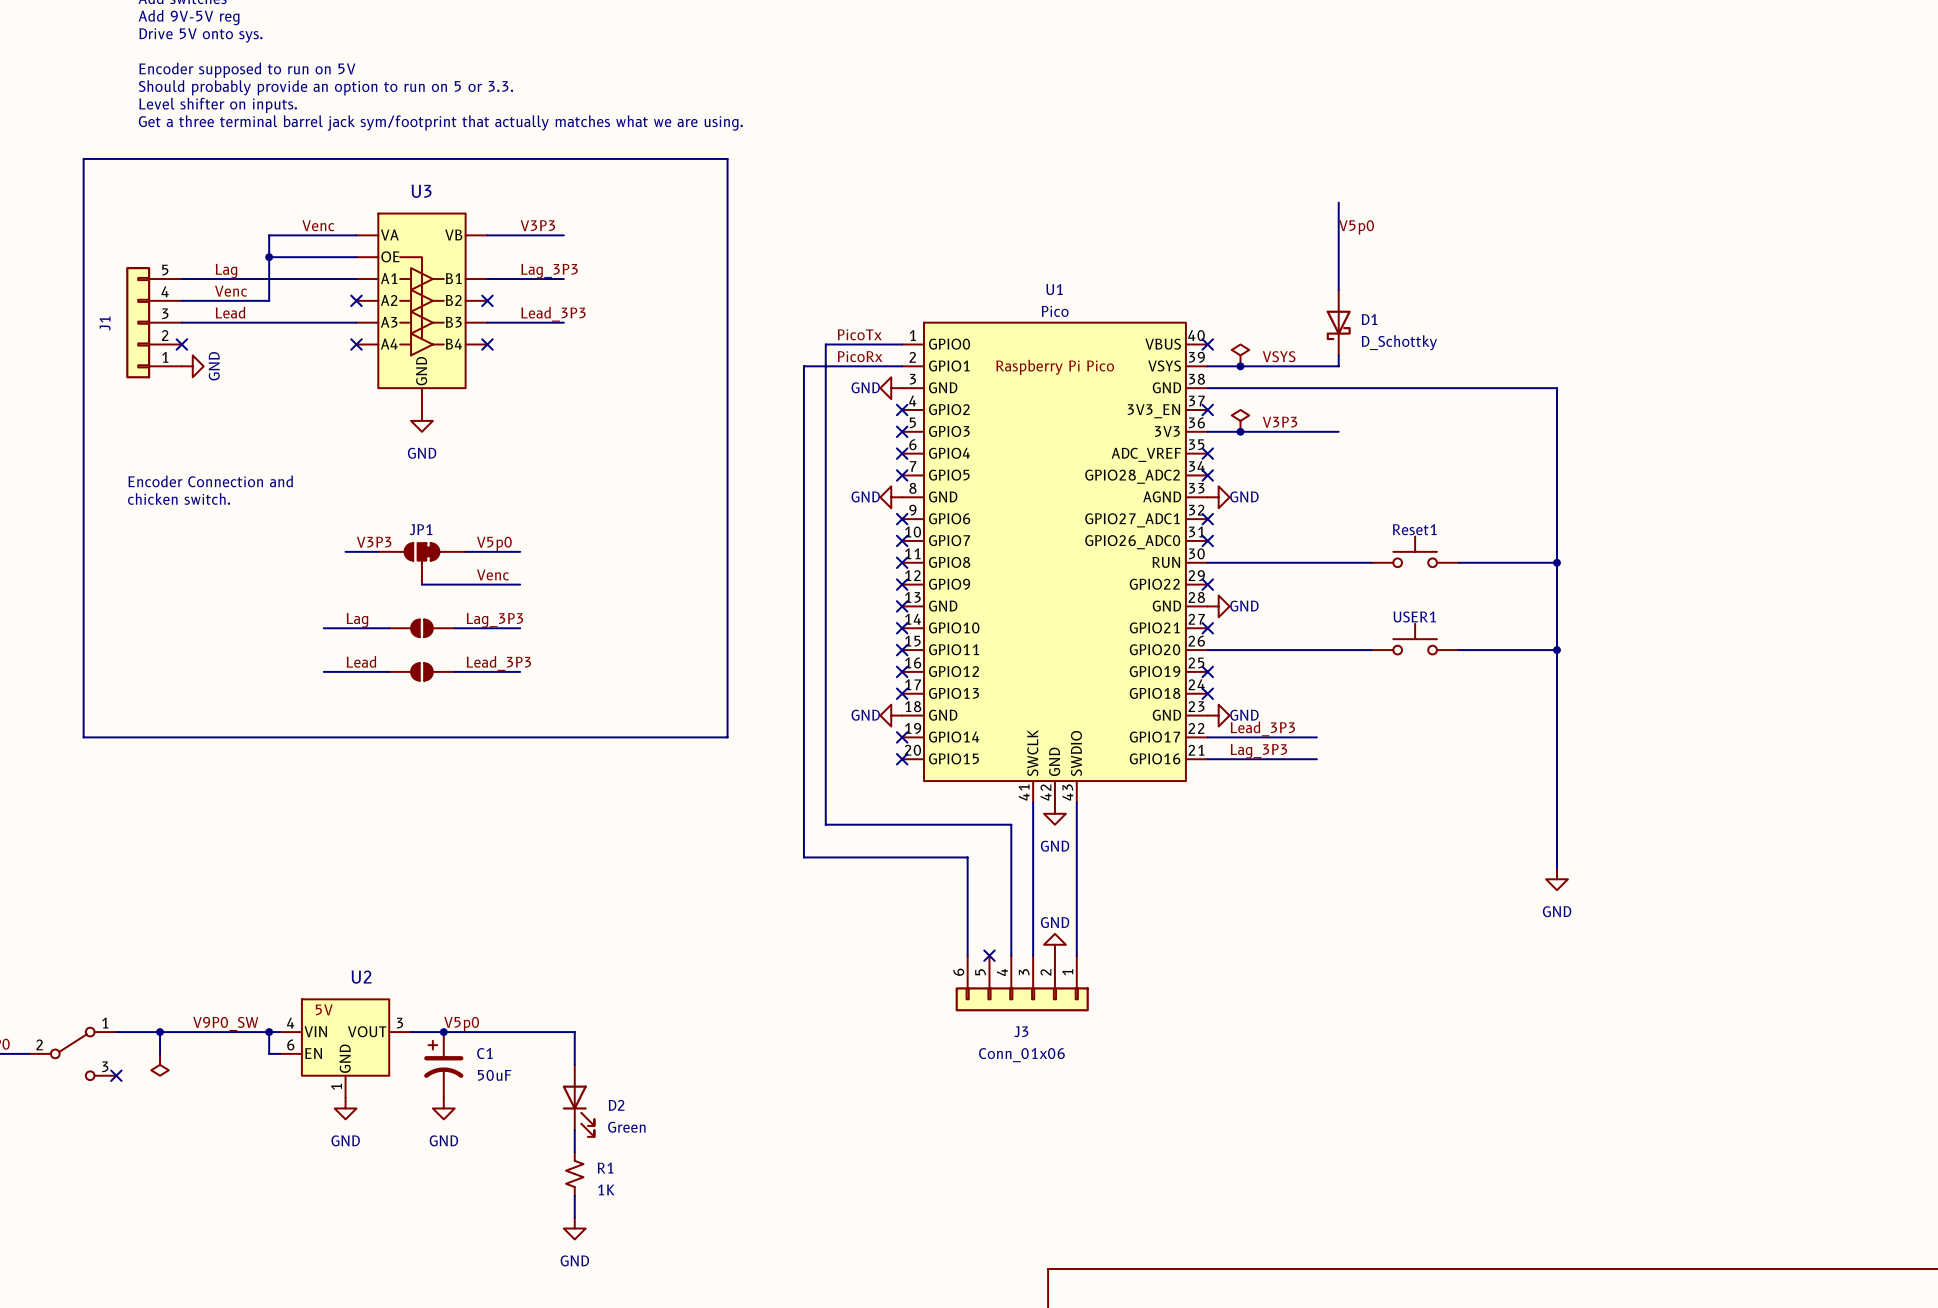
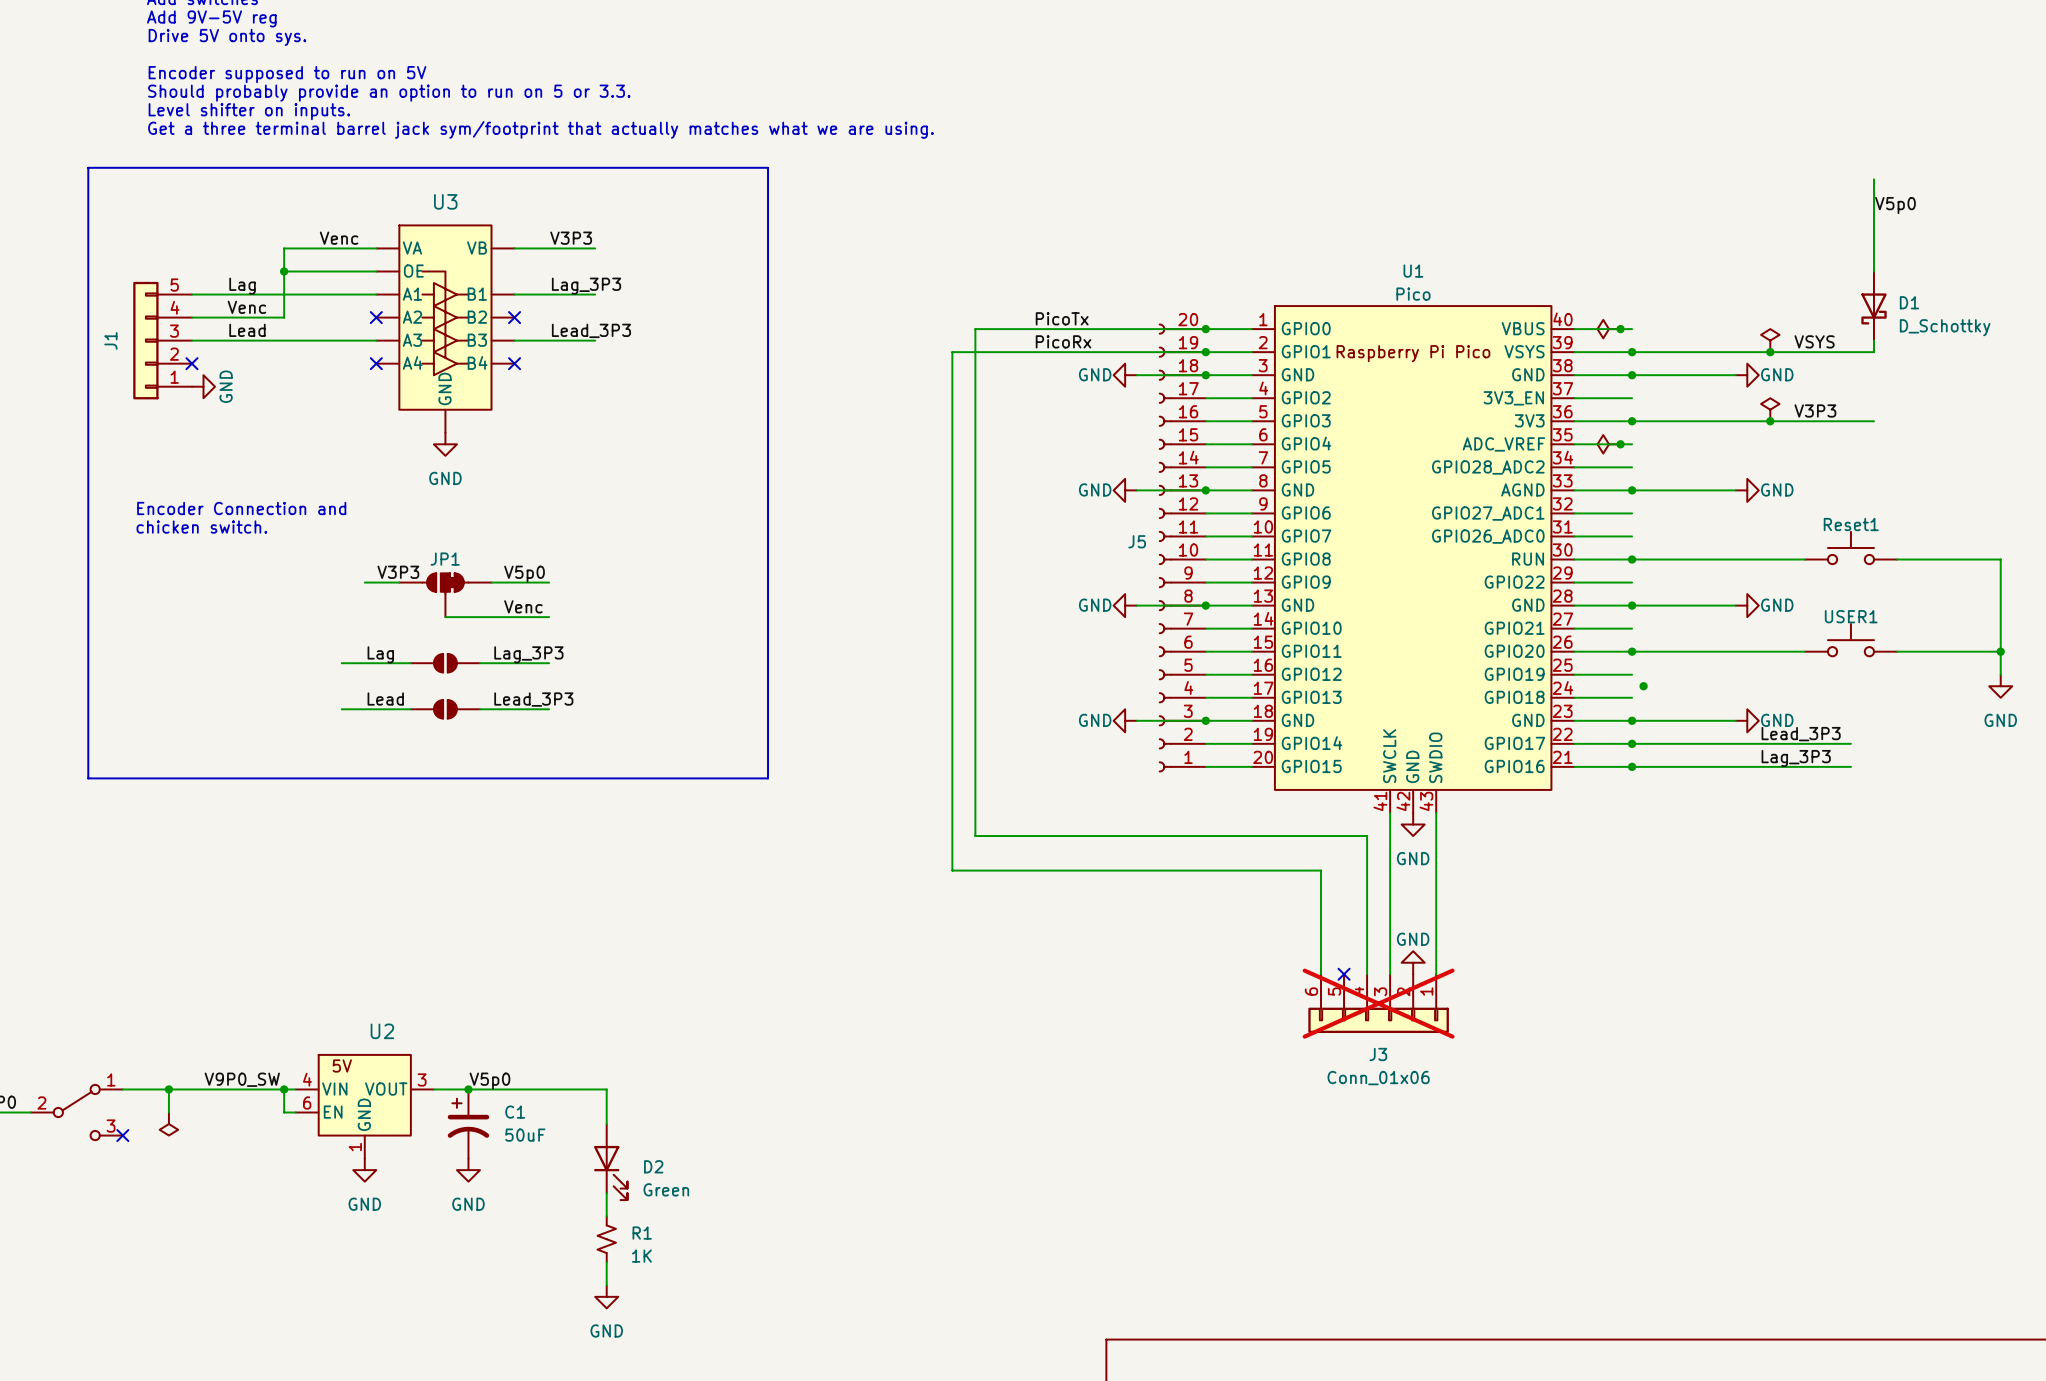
wire: none -> (1874, 179) (1874, 271)
label: none -> V5p0 (1895, 205)
wire: (1338, 202) (1338, 289) -> none
label: V5p0 (1356, 227) -> none
junction: none -> (1205, 329)
wire: none -> (1251, 329) (975, 329) (975, 836) (1367, 836) (1367, 974)
wire: none -> (1574, 329) (1632, 329)
power symbol: none -> (1609, 329)
junction: none -> (1620, 329)
D1 position: (1338, 322) -> (1874, 306)
power symbol: none -> (1770, 340)
wire: none -> (1874, 340) (1874, 352) (1574, 352)
label: none -> VSYS (1814, 341)
junction: none -> (1205, 352)
junction: none -> (1632, 352)
junction: none -> (1770, 352)
label position: PicoTx (859, 334) -> PicoTx (1062, 318)
wire: (902, 344) (825, 344) (825, 824) (902, 824) -> (1251, 352) (952, 352) (952, 870)
no-connect mark: (1207, 344) -> none
power symbol: none -> GND (1125, 375)
junction: none -> (1205, 375)
power symbol: (1240, 355) -> none
wire: none -> (1574, 375) (1735, 375)
junction: none -> (1632, 375)
power symbol: none -> GND (1747, 375)
label position: PicoRx (860, 356) -> PicoRx (1063, 341)
label: VSYS (1279, 356) -> none
wire: (902, 366) (803, 366) (803, 857) (967, 857) (967, 955) -> none
junction: (1240, 366) -> none
wire: none -> (1574, 398) (1632, 398)
power symbol: GND (891, 388) -> none
wire: (1207, 388) (1556, 388) (1556, 868) -> none
power symbol: none -> (1770, 409)
label: none -> V3P3 (1815, 410)
wire: none -> (1574, 421) (1874, 421)
junction: none -> (1632, 421)
junction: none -> (1770, 421)
no-connect mark: (902, 409) -> none
no-connect mark: (1207, 409) -> none
power symbol: (1240, 420) -> none
wire: none -> (1574, 444) (1632, 444)
power symbol: none -> (1609, 444)
junction: none -> (1620, 444)
label: V3P3 (1280, 422) -> none
no-connect mark: (902, 431) -> none
junction: (1240, 431) -> none
wire: none -> (1574, 467) (1632, 467)
no-connect mark: (902, 453) -> none
no-connect mark: (1207, 453) -> none
power symbol: none -> GND (1125, 490)
junction: none -> (1205, 490)
wire: none -> (1574, 490) (1735, 490)
junction: none -> (1632, 490)
power symbol: none -> GND (1747, 490)
no-connect mark: (902, 475) -> none
no-connect mark: (1207, 475) -> none
wire: none -> (1574, 513) (1632, 513)
power symbol: GND (891, 497) -> none
power symbol: GND (1218, 497) -> none
wire: none -> (1574, 536) (1632, 536)
no-connect mark: (902, 519) -> none
J5: none -> (1182, 547)
no-connect mark: (1207, 519) -> none
wire: none -> (1574, 559) (1804, 559)
junction: none -> (1632, 559)
wire: none -> (1897, 559) (2000, 559) (2000, 674)
no-connect mark: (902, 540) -> none
no-connect mark: (1207, 540) -> none
Reset1 position: (1415, 551) -> (1850, 547)
wire: none -> (1574, 582) (1632, 582)
no-connect mark: (902, 562) -> none
U1 position: (1054, 562) -> (1413, 559)
wire: (1458, 562) (1556, 562) -> none
junction position: (1556, 562) -> (1632, 605)
power symbol: none -> GND (1125, 605)
junction: none -> (1205, 605)
wire: none -> (1574, 605) (1735, 605)
power symbol: none -> GND (1747, 605)
no-connect mark: (902, 584) -> none
no-connect mark: (1207, 584) -> none
wire: none -> (1574, 628) (1632, 628)
no-connect mark: (902, 606) -> none
power symbol: GND (1218, 606) -> none
wire: none -> (1574, 651) (1804, 651)
junction: none -> (1632, 651)
wire: none -> (1897, 651) (2000, 651)
junction: none -> (2000, 651)
no-connect mark: (902, 628) -> none
no-connect mark: (1207, 628) -> none
USER1 position: (1415, 639) -> (1850, 640)
wire: none -> (1574, 674) (1632, 674)
no-connect mark: (902, 650) -> none
wire: (1458, 650) (1556, 650) -> none
power symbol: none -> GND (2000, 686)
wire: none -> (1574, 697) (1632, 697)
no-connect mark: (902, 671) -> none
no-connect mark: (1207, 671) -> none
power symbol: none -> GND (1125, 720)
junction: none -> (1205, 720)
wire: none -> (1574, 720) (1735, 720)
junction: none -> (1632, 720)
power symbol: none -> GND (1747, 720)
no-connect mark: (902, 693) -> none
no-connect mark: (1207, 693) -> none
label: none -> Lead_3P3 (1801, 734)
wire: none -> (1574, 743) (1850, 743)
junction: none -> (1632, 743)
power symbol: GND (891, 715) -> none
power symbol: GND (1218, 715) -> none
label: none -> Lag_3P3 (1796, 758)
wire: none -> (1574, 766) (1850, 766)
junction: none -> (1632, 766)
label: Lead_3P3 (1262, 728) -> none
no-connect mark: (902, 737) -> none
label: Lag_3P3 (1258, 751) -> none
no-connect mark: (902, 759) -> none
wire: (1207, 759) (1316, 759) -> none
wire: none -> (1390, 812) (1390, 974)
wire: none -> (1436, 812) (1436, 974)
power symbol: none -> GND (1413, 824)
wire: (1033, 802) (1033, 955) -> none
wire: (1076, 802) (1076, 955) -> none
power symbol: GND (1054, 813) -> none
wire: (1011, 824) (1011, 955) -> (1067, 870) (1321, 870) (1321, 974)
power symbol: GND (1556, 879) -> none
power symbol: none -> GND (1413, 962)
no-connect mark: none -> (1344, 974)
power symbol: GND (1054, 944) -> none
J3 do-not-place cross: none -> (1378, 1003)
no-connect mark: (989, 955) -> none
J3 position: (1022, 983) -> (1378, 1003)

